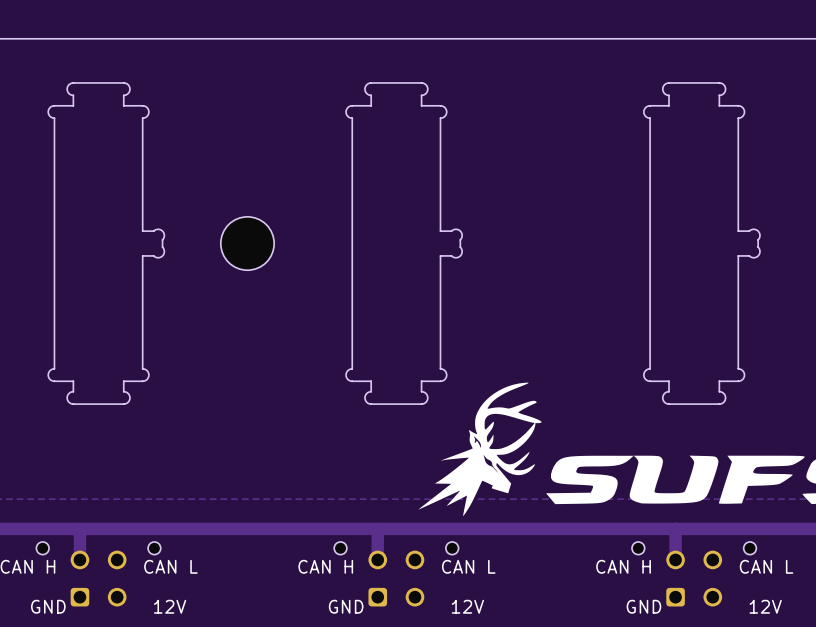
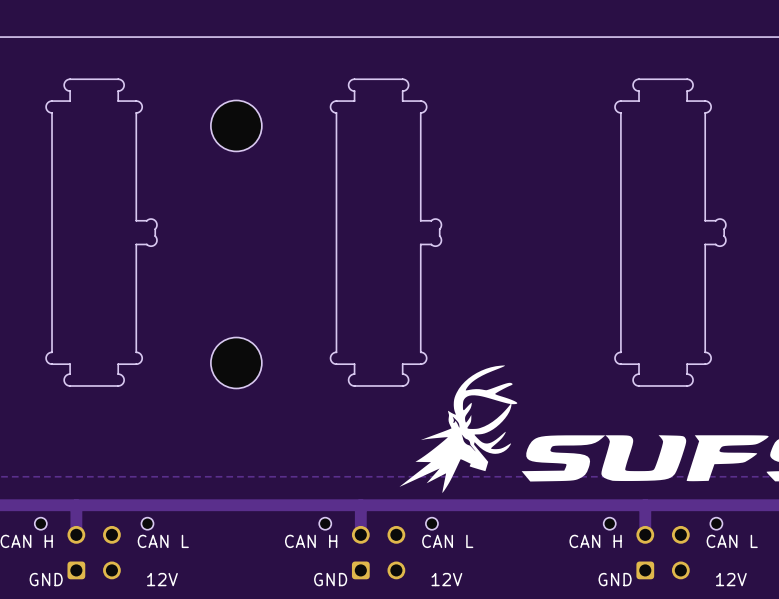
part: none -> (236, 125)
part: (247, 243) -> none
part: none -> (236, 362)

